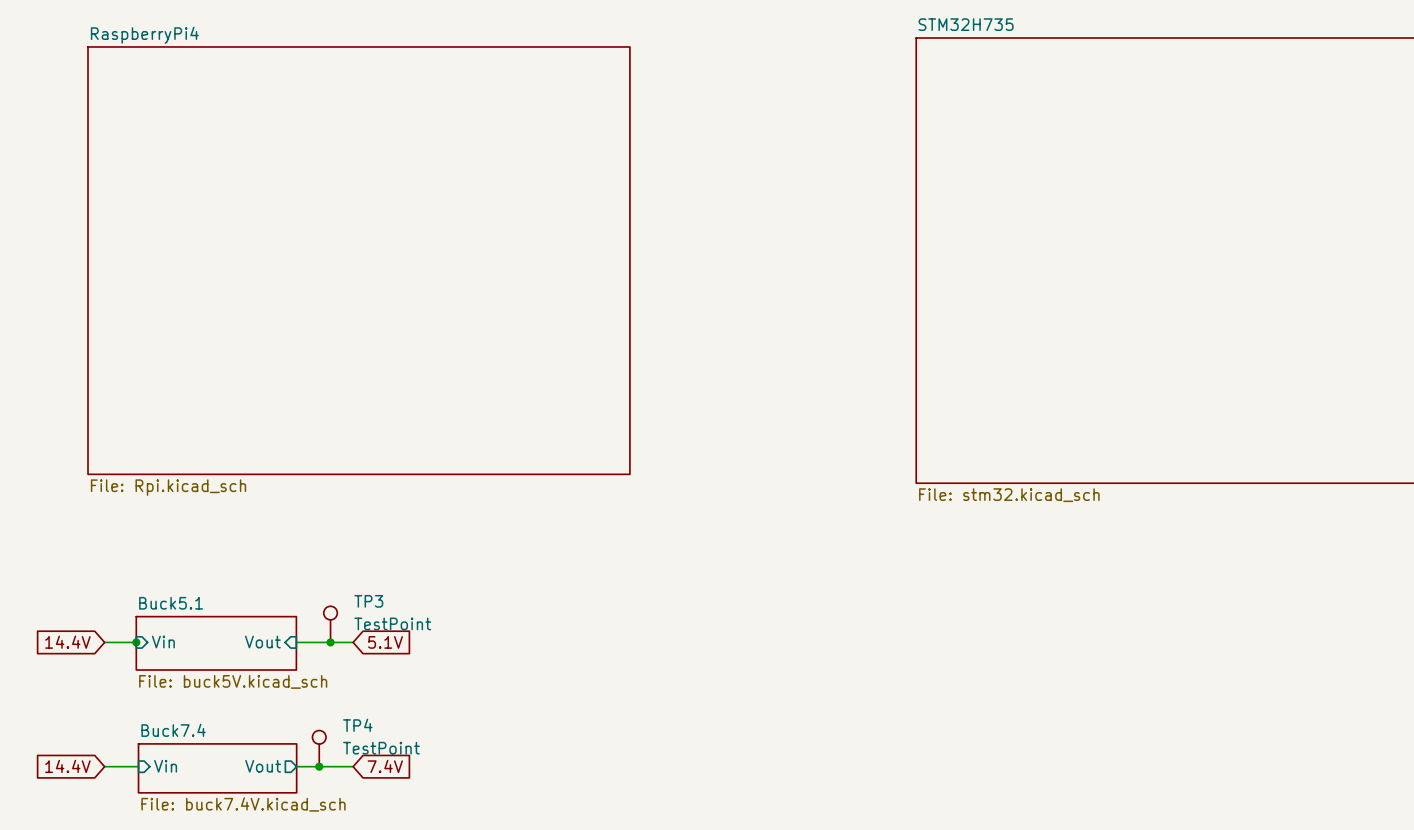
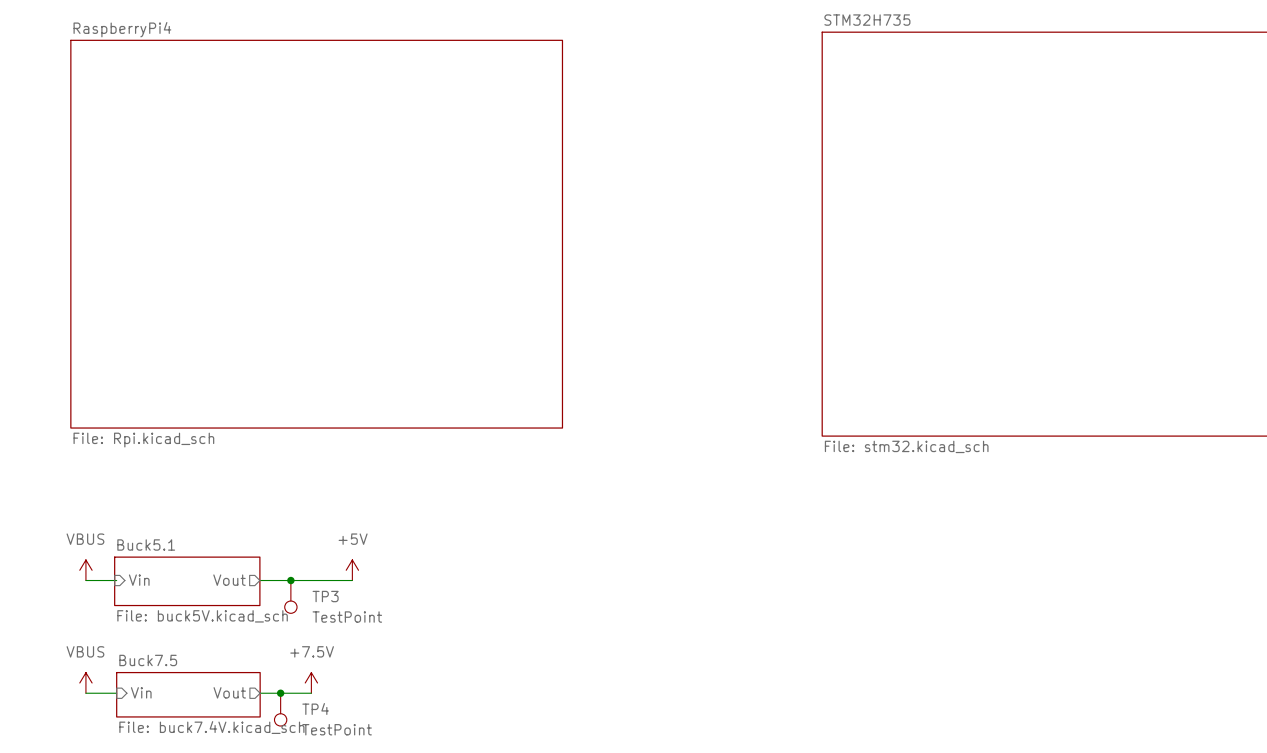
TP3 name position: TP3 (368, 601) -> TP3 (325, 596)
TP3 rotation: 0° (330, 613) -> 180° (290, 607)
TP3 value position: TestPoint (392, 623) -> TestPoint (347, 617)
TP3 position: (330, 624) -> (290, 596)
power symbol: none -> VBUS (85, 570)
power symbol: none -> +5V (352, 570)
global label: 14.4V (67, 642) -> none
junction: (136, 642) -> none
sheet pin shape: input (262, 642) -> output (229, 580)
wire: none -> (311, 580) (352, 580)
global label: 5.1V (385, 642) -> none
TP4 name position: TP4 (357, 725) -> TP4 (315, 709)
sheet Buck7.4 name: Buck7.4 (173, 730) -> Buck7.5 (148, 660)
TP4 rotation: 0° (319, 737) -> 180° (280, 719)
TP4 position: (319, 748) -> (280, 709)
TP4 value position: TestPoint (381, 748) -> TestPoint (337, 729)
power symbol: none -> VBUS (85, 682)
power symbol: none -> +7.5V (311, 682)
global label: 14.4V (67, 766) -> none
global label: 7.4V (385, 766) -> none

